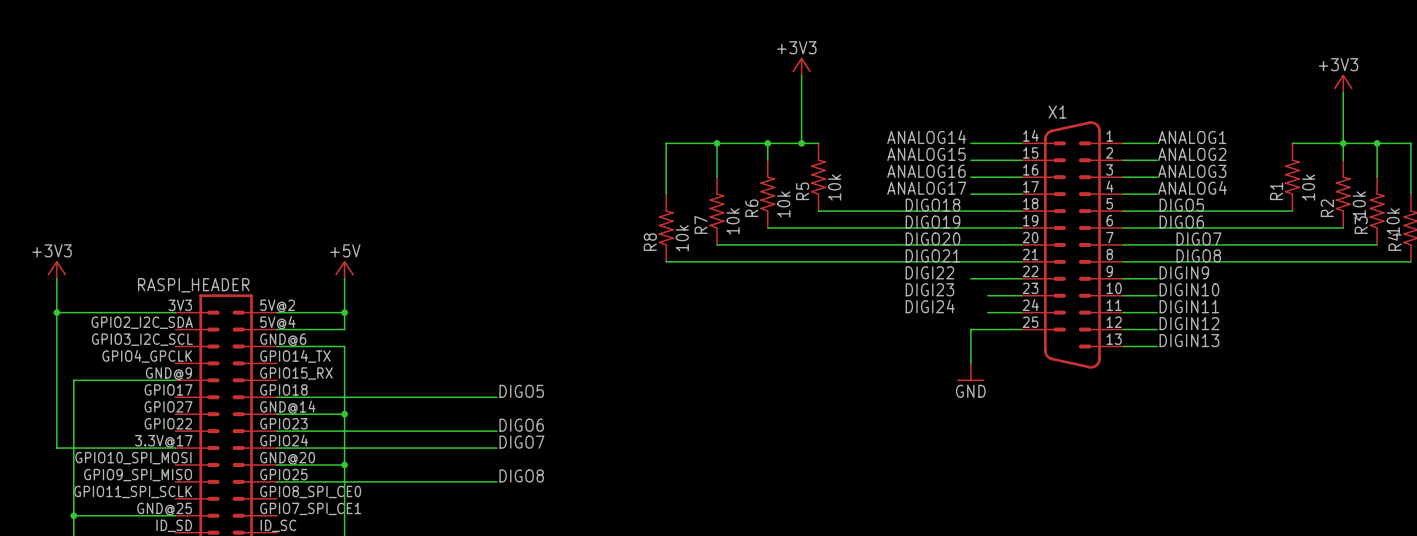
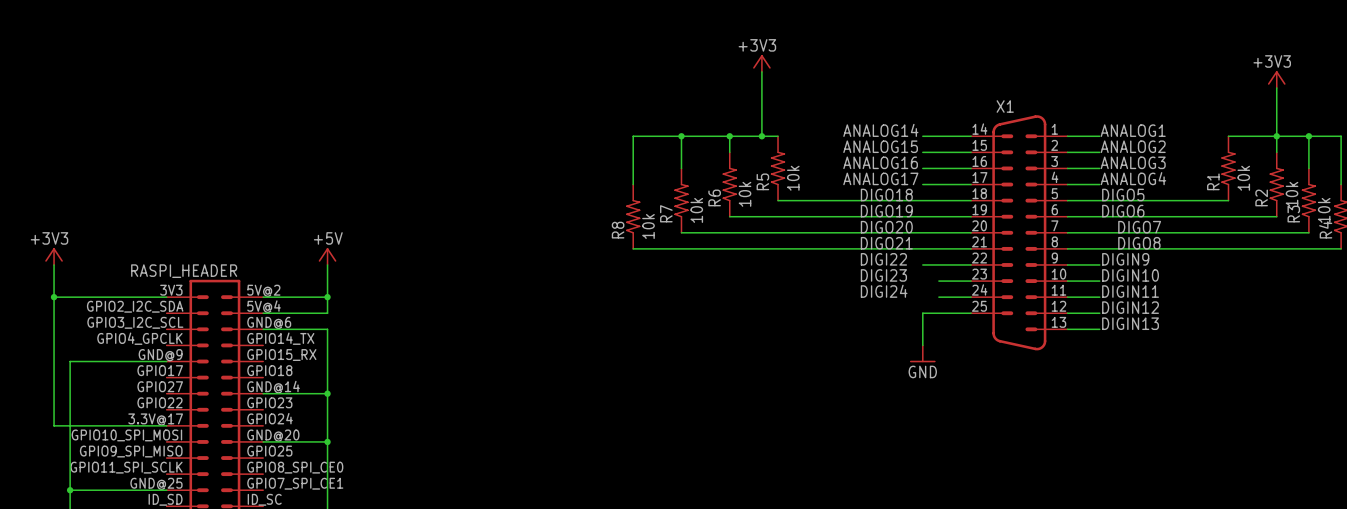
label: DIGO5 (521, 391) -> none
wire: (276, 397) (496, 397) -> none
label: DIGO6 (521, 425) -> none
wire: (276, 431) (496, 431) -> none
label: DIGO7 (521, 442) -> none
wire: (276, 448) (496, 448) -> none
label: DIGO8 (521, 475) -> none
wire: (276, 481) (496, 481) -> none

